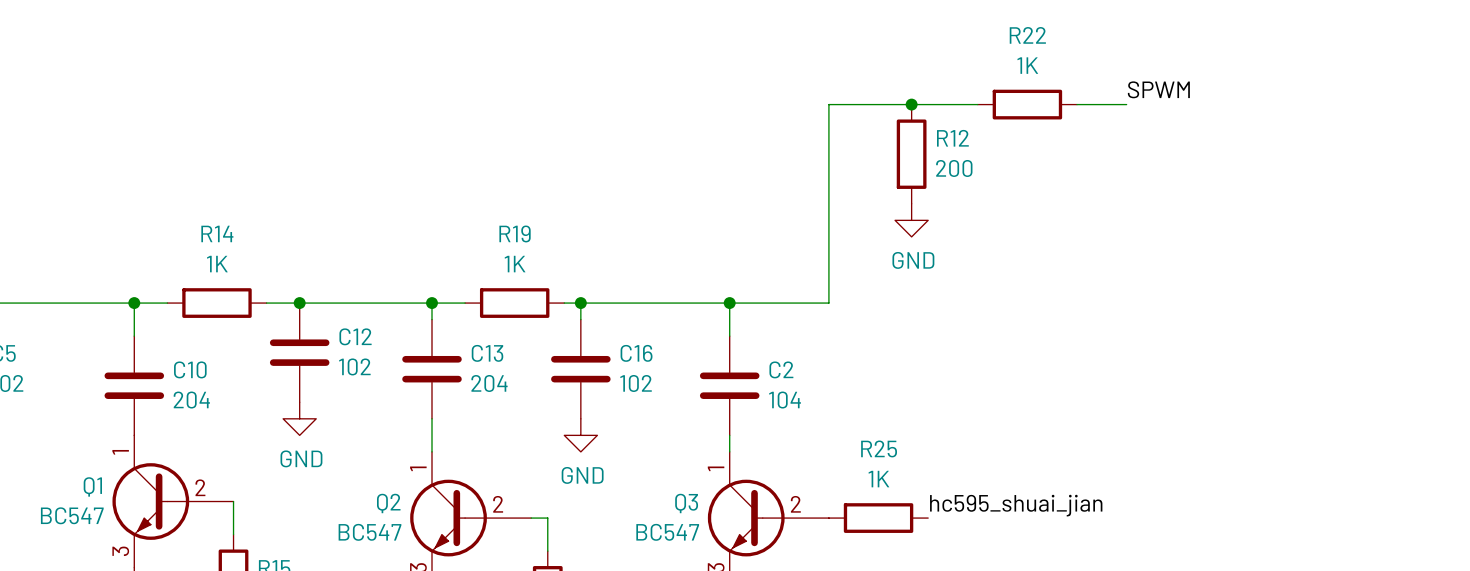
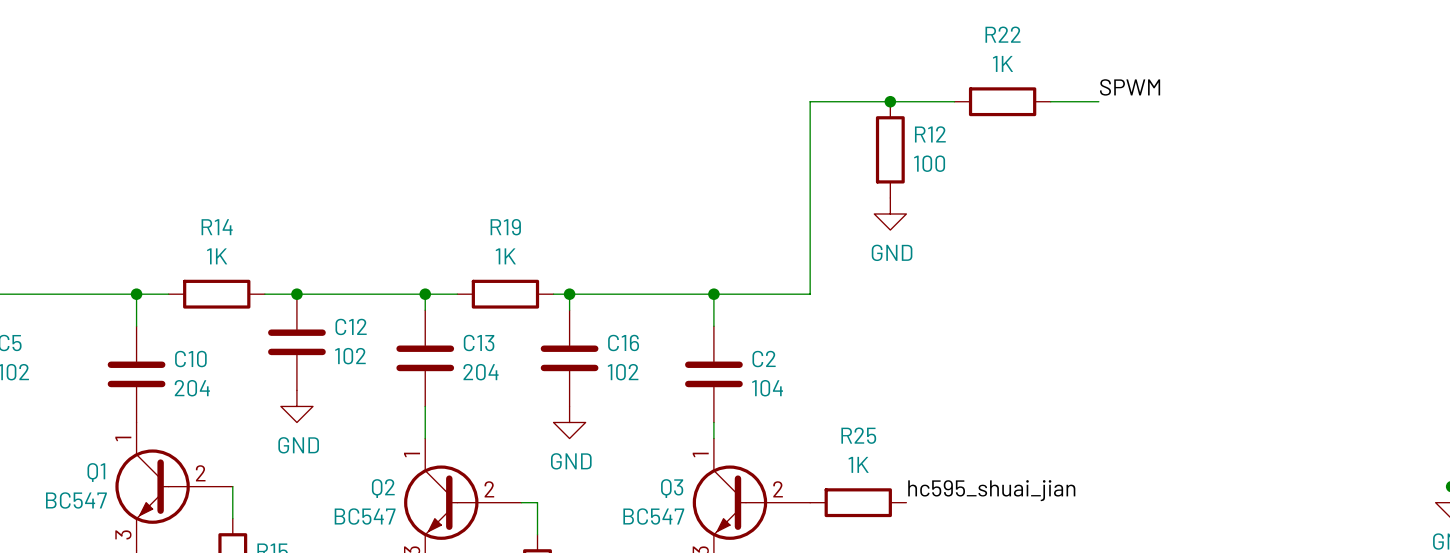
R12 value: 200 (954, 168) -> 100 (929, 163)

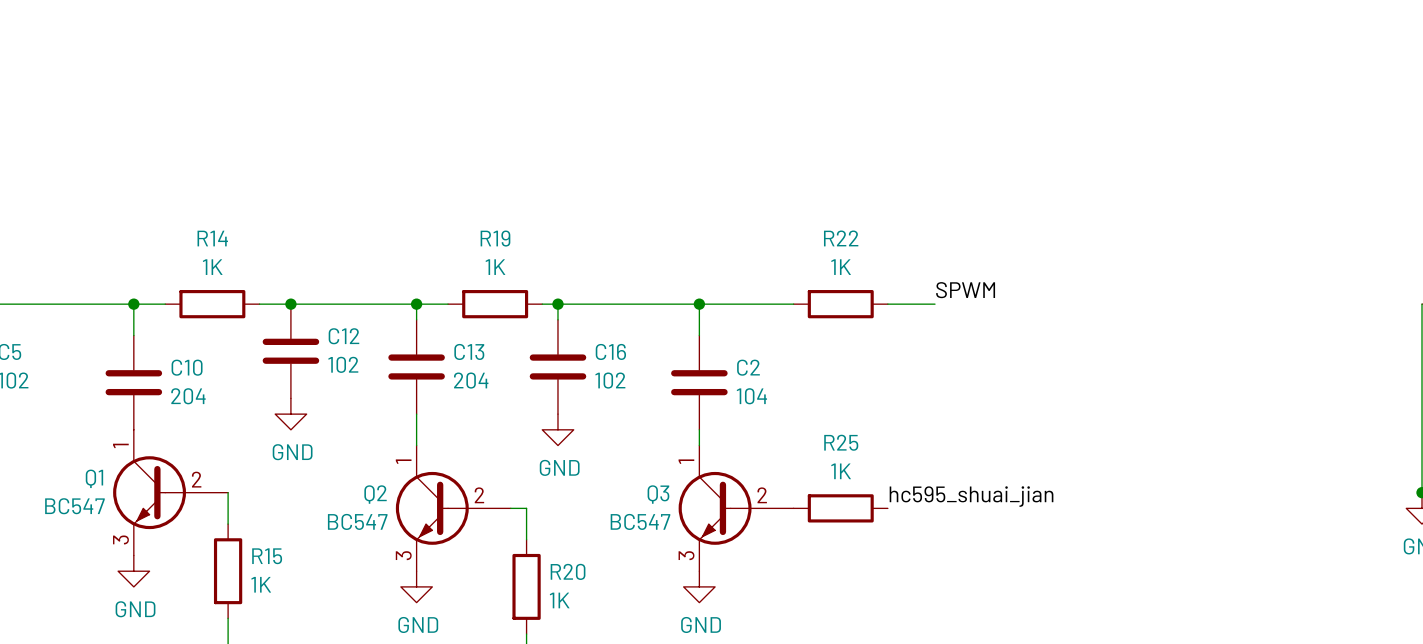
label position: SPWM (1130, 87) -> SPWM (965, 290)
junction: (890, 101) -> none
wire: (954, 101) (810, 101) (810, 294) -> none
R22 position: (1002, 101) -> (840, 304)
wire: (1050, 101) (1098, 101) -> (887, 304) (935, 304)
R12: 100 (890, 149) -> none
power symbol: GND (890, 214) -> none

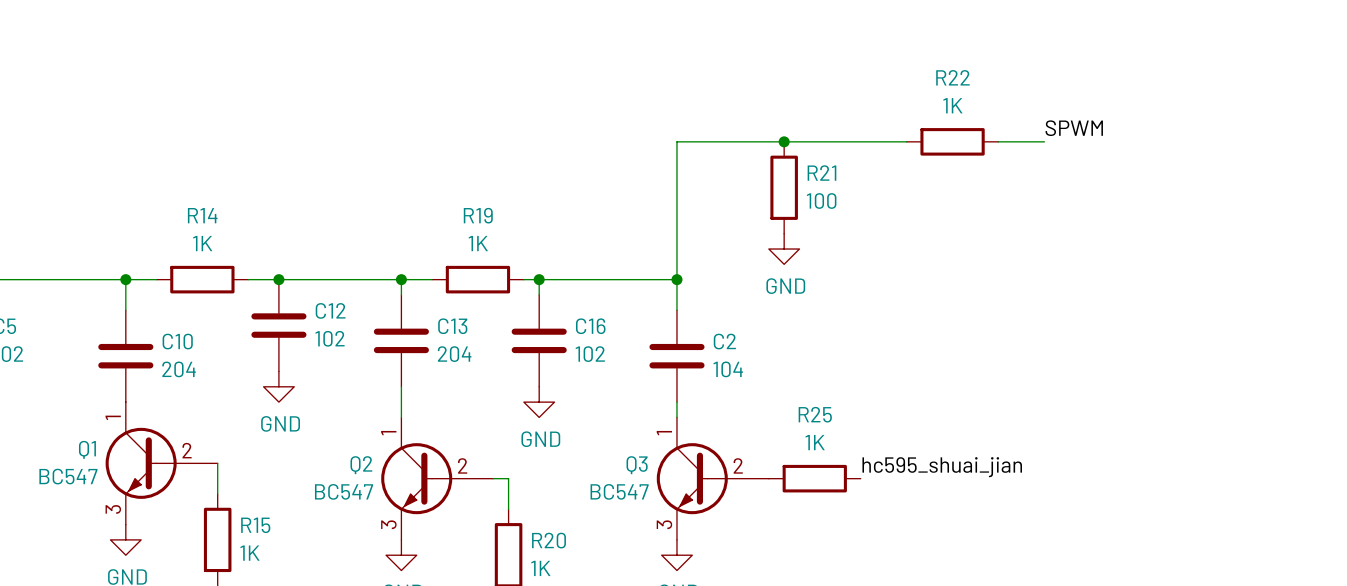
junction: none -> (784, 141)
R21: none -> 100 (784, 187)
power symbol: none -> GND (784, 249)
label position: SPWM (965, 290) -> SPWM (1074, 128)
wire: (699, 304) (793, 304) -> (676, 279) (676, 141) (906, 141)
R22 position: (840, 304) -> (952, 141)
wire: (887, 304) (935, 304) -> (998, 141) (1044, 141)

